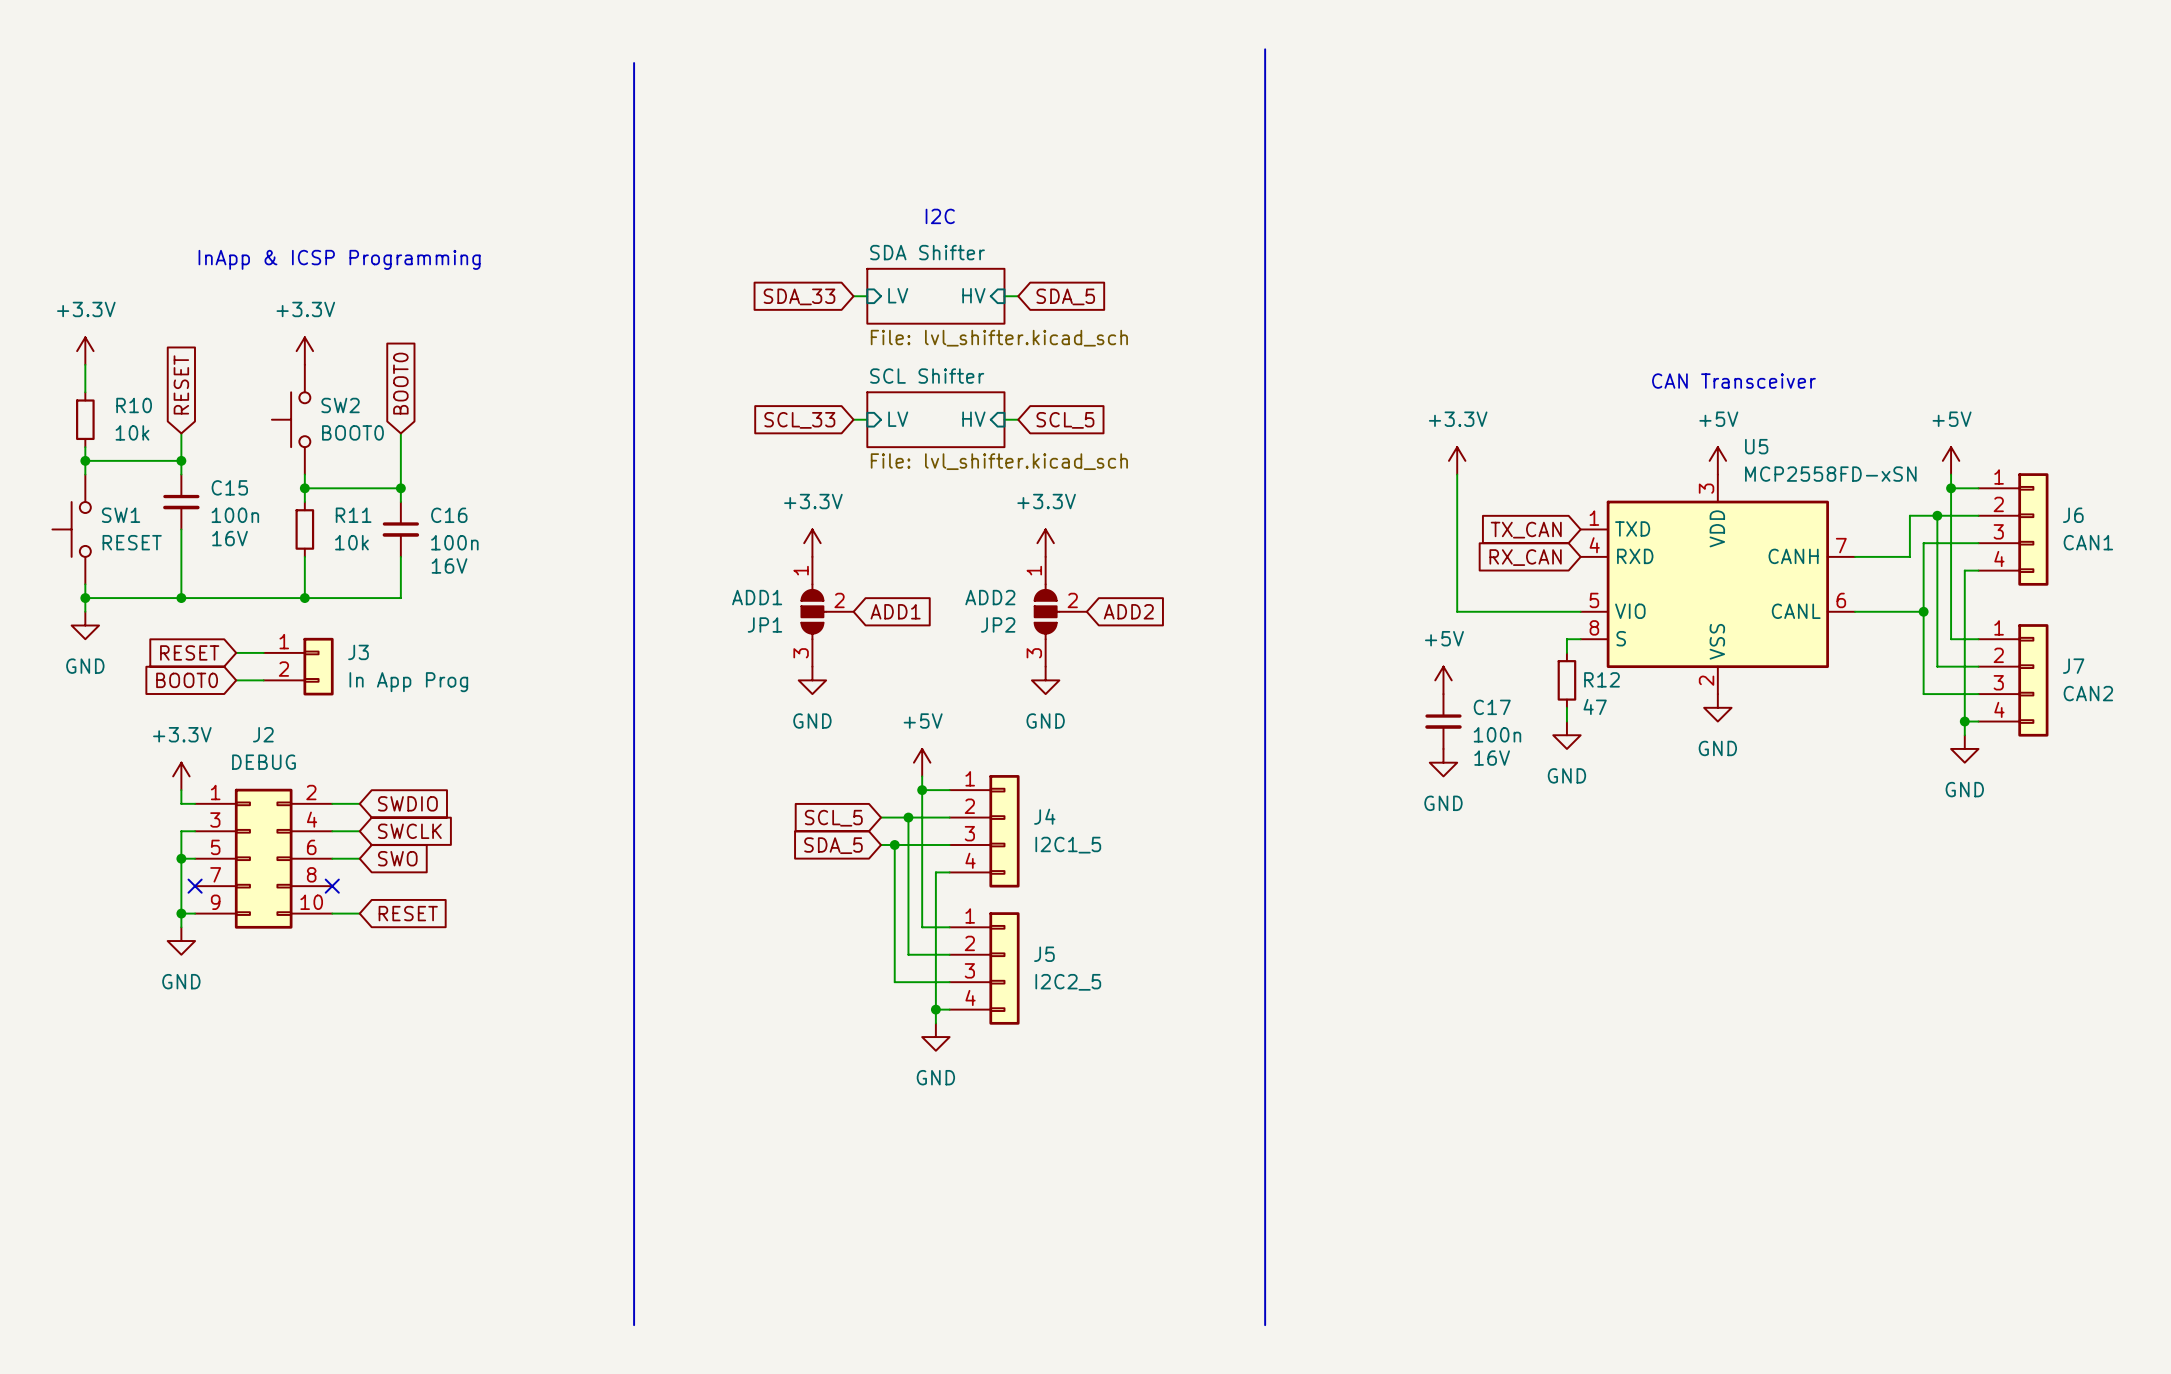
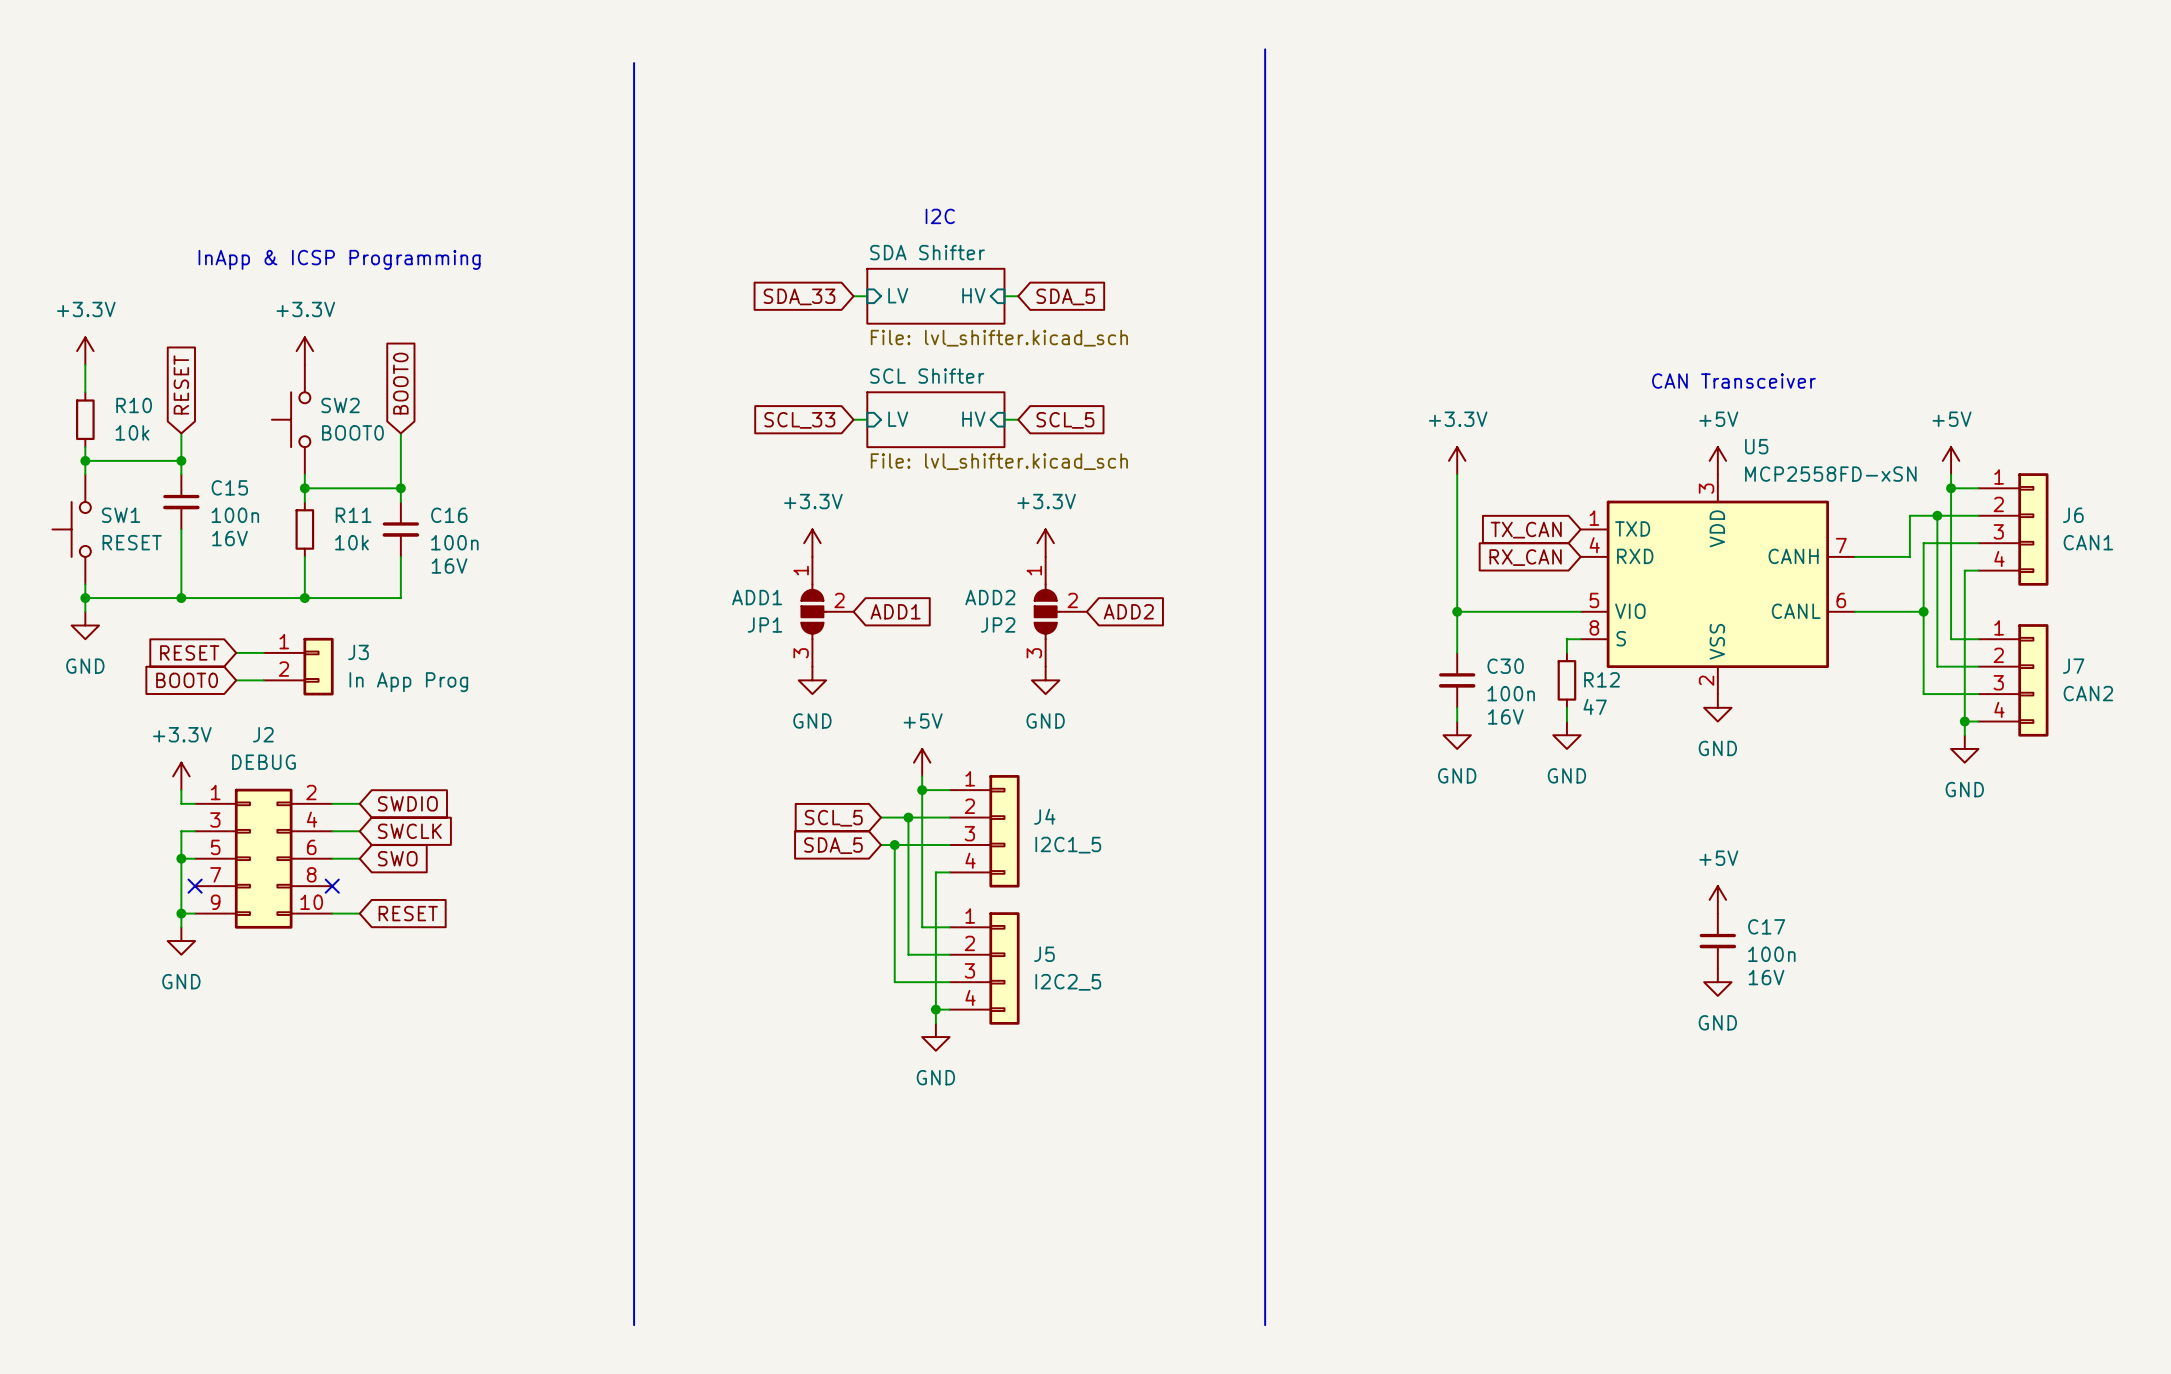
wire: none -> (1457, 611) (1457, 652)
junction: none -> (1457, 611)
power symbol: +5V (1443, 680) -> none
C30: none -> 100n (1457, 680)
wire: none -> (1457, 707) (1457, 721)
C17 position: (1443, 721) -> (1717, 941)
power symbol position: GND (1443, 762) -> GND (1457, 735)
power symbol: none -> +5V (1717, 899)
power symbol: none -> GND (1717, 982)

